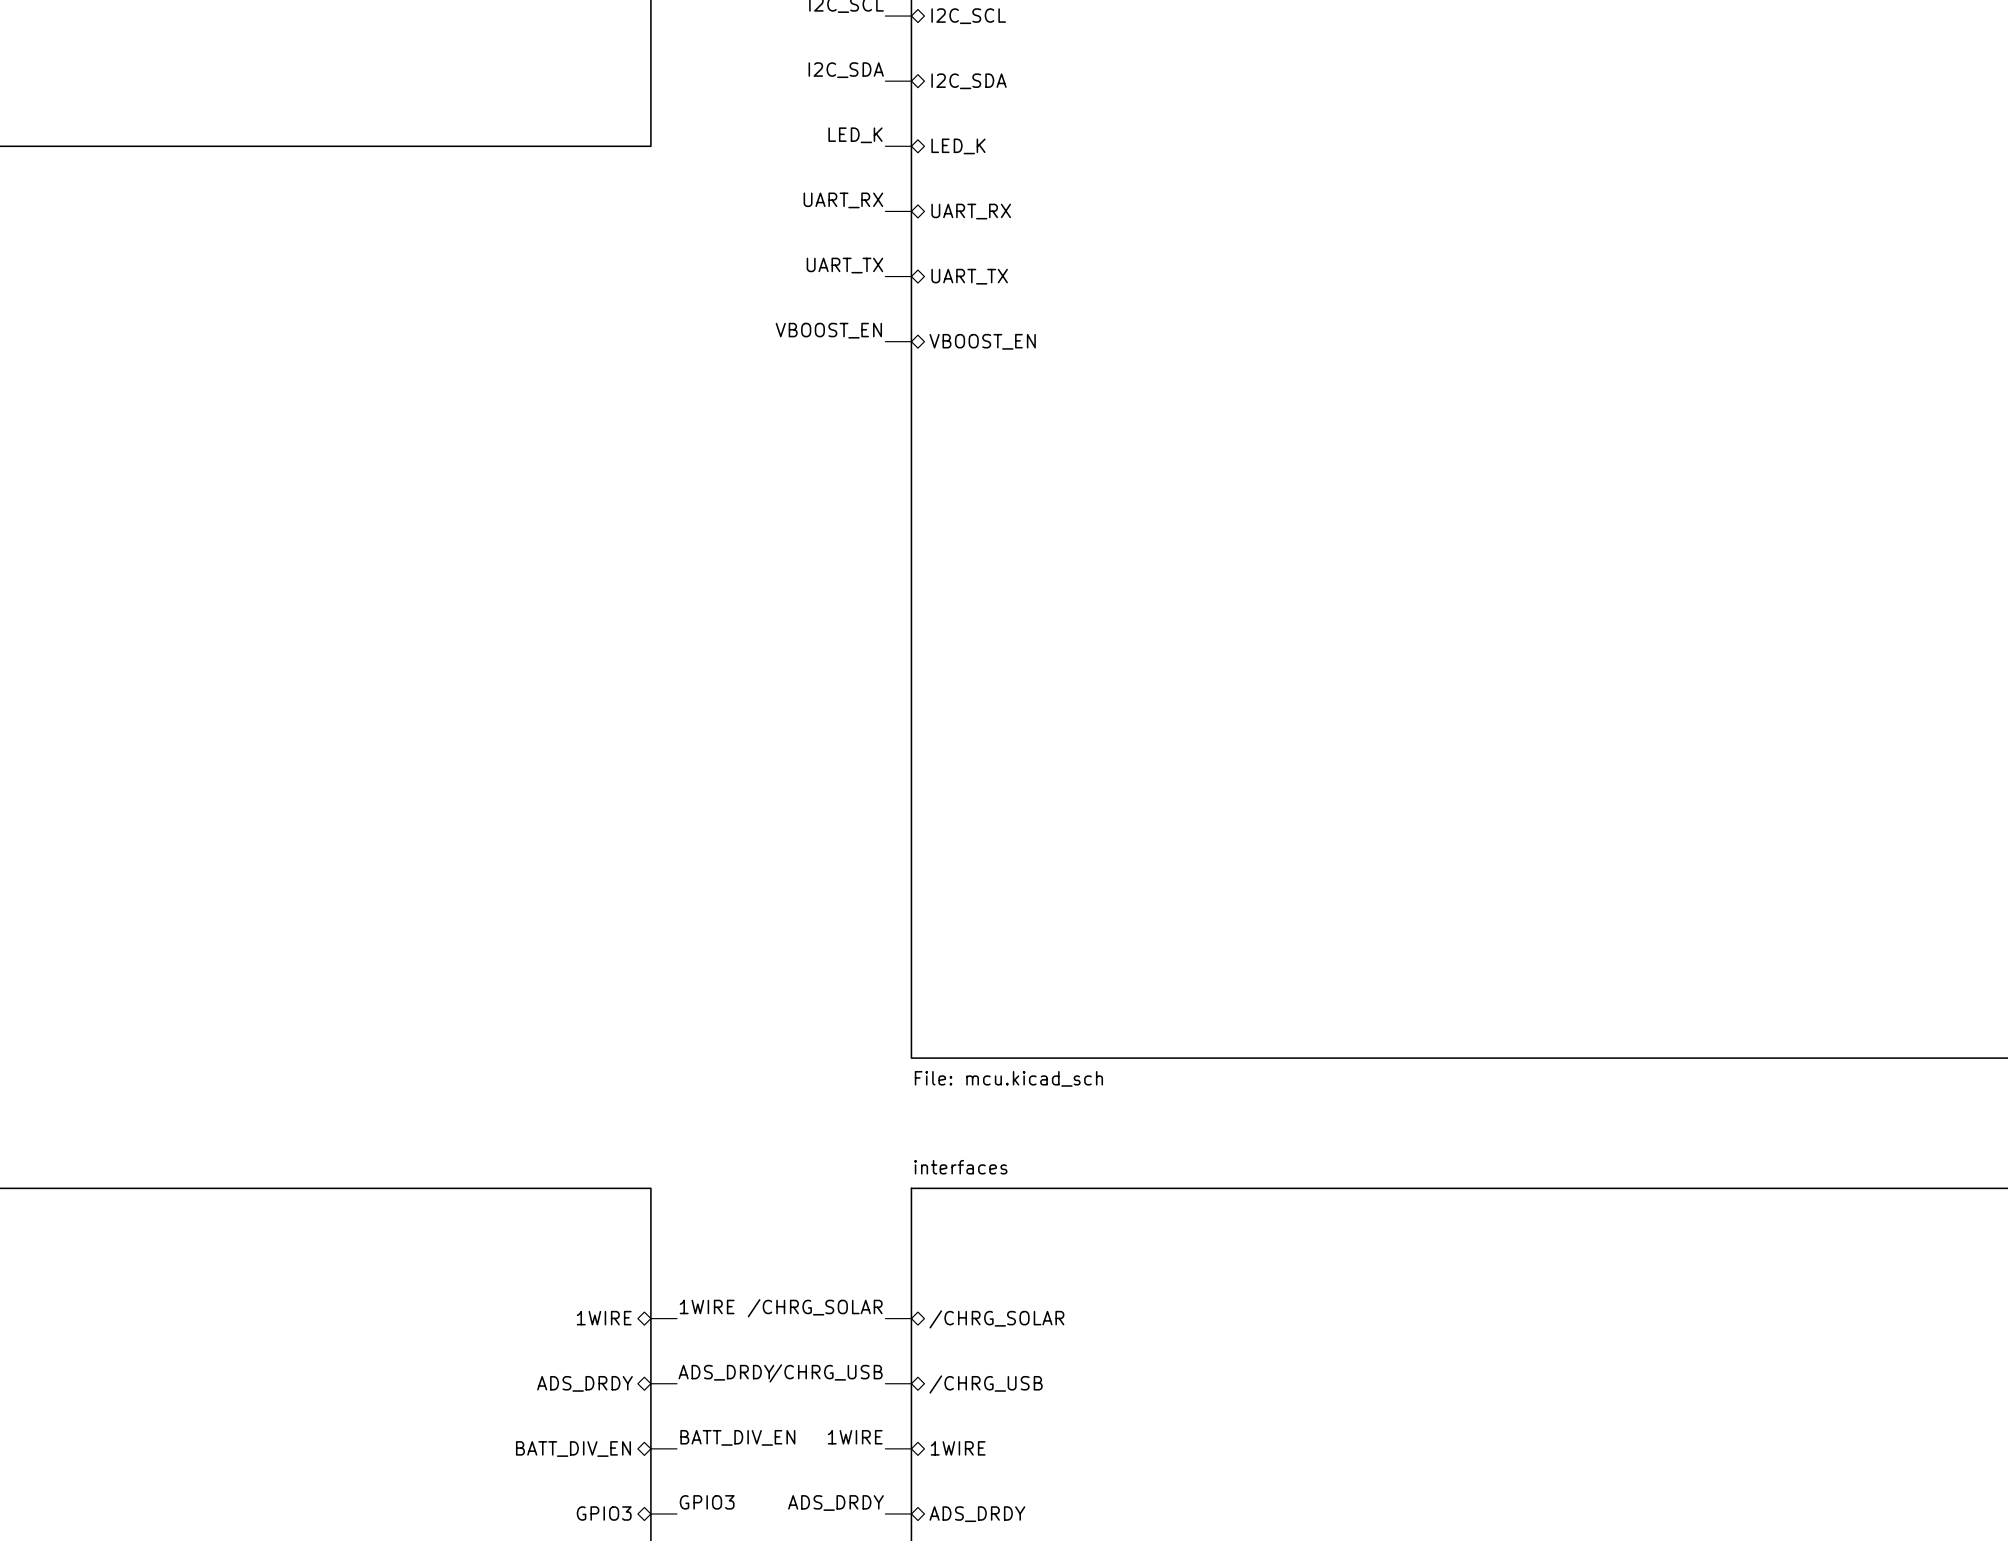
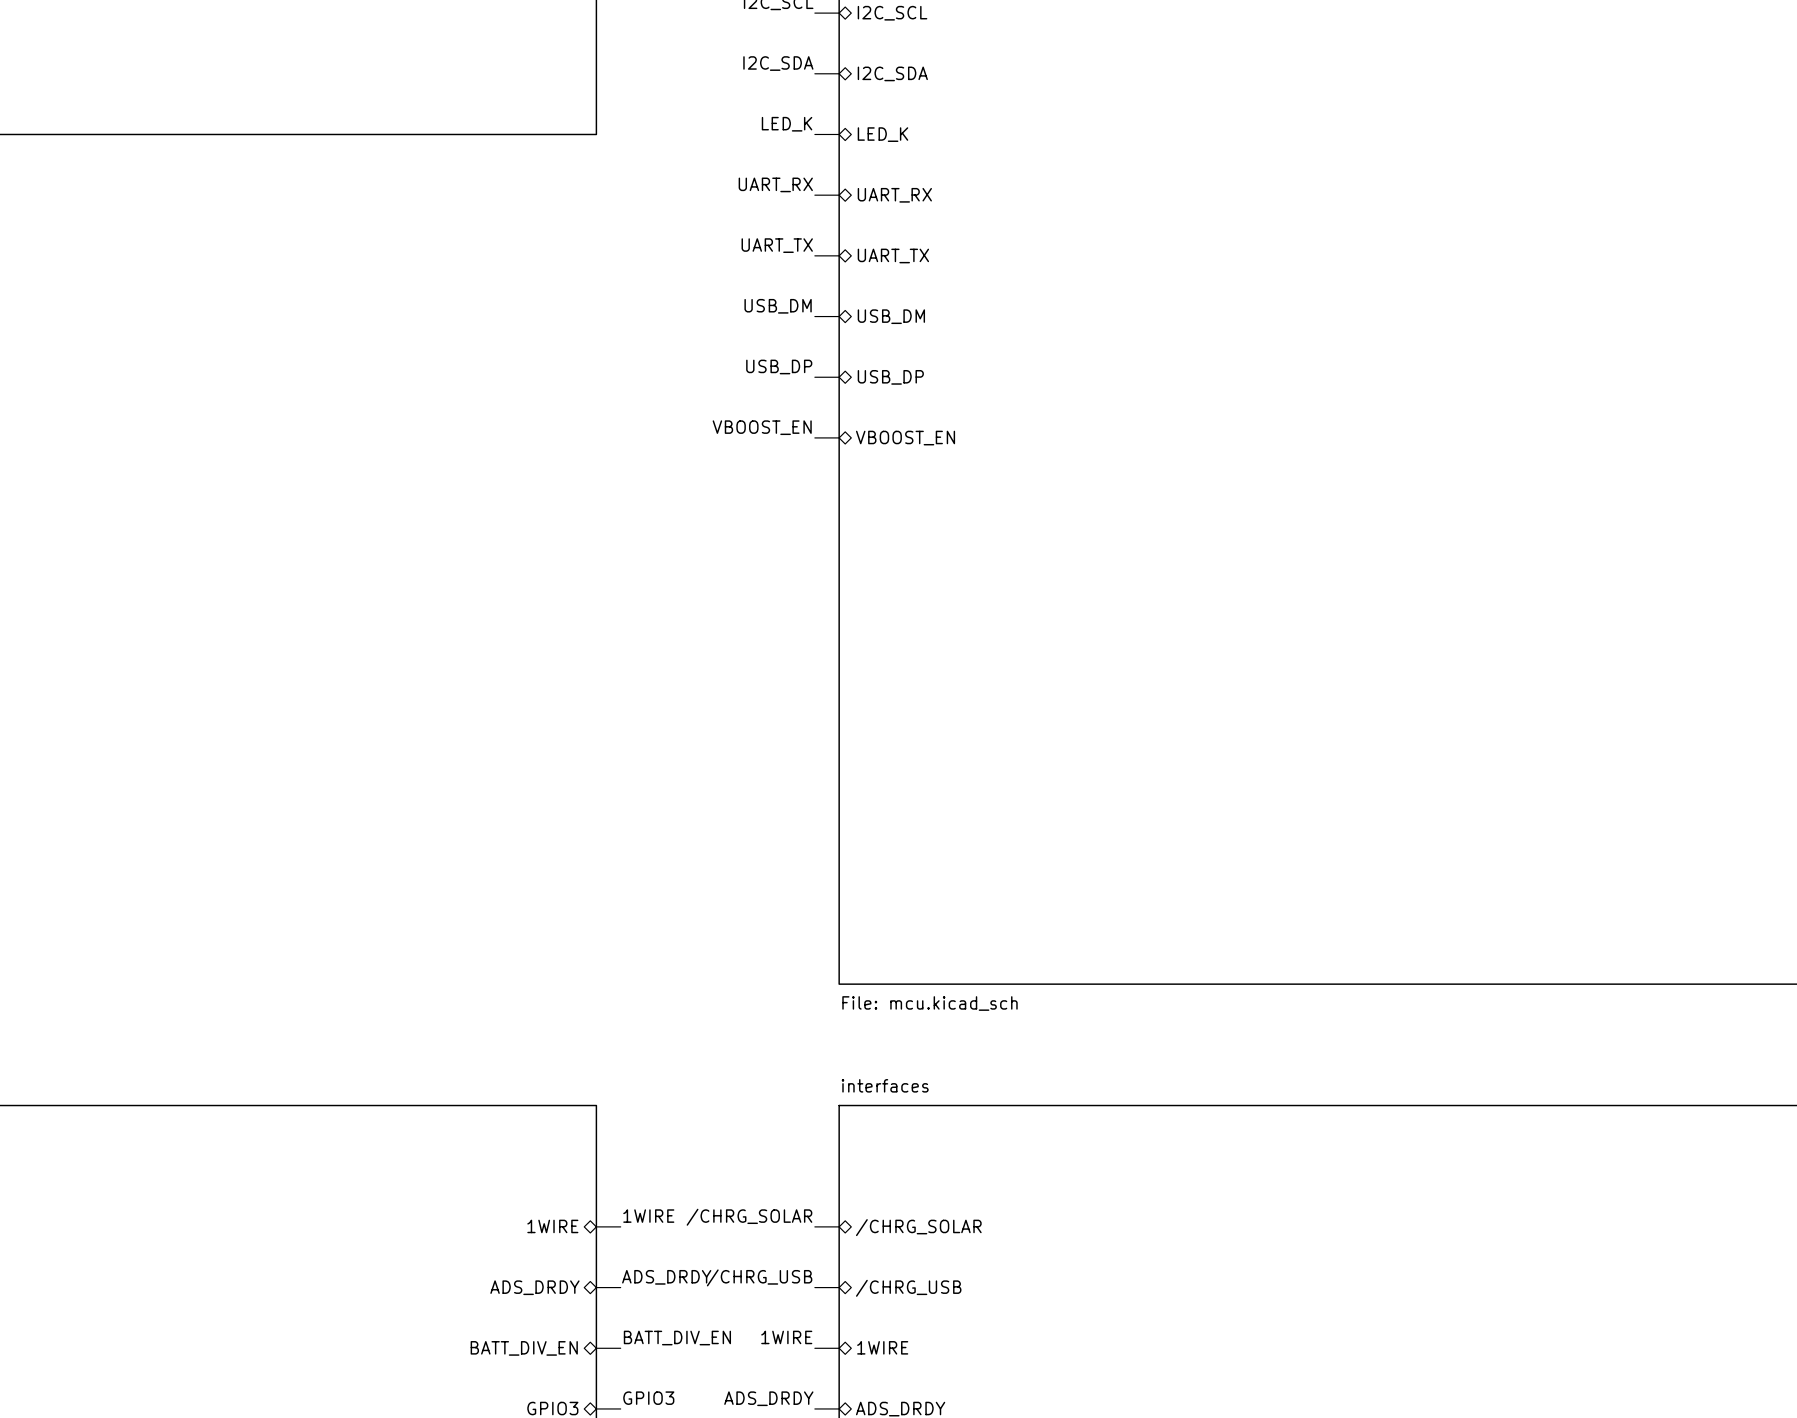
label: VBOOST_EN (828, 330) -> USB_DM (778, 306)
sheet pin: VBOOST_EN (982, 341) -> USB_DM (891, 316)
label: none -> USB_DP (779, 366)
wire: none -> (814, 377) (839, 377)
sheet pin: none -> USB_DP (890, 377)
label: none -> VBOOST_EN (762, 427)
wire: none -> (814, 437) (839, 437)
sheet pin: none -> VBOOST_EN (905, 438)

